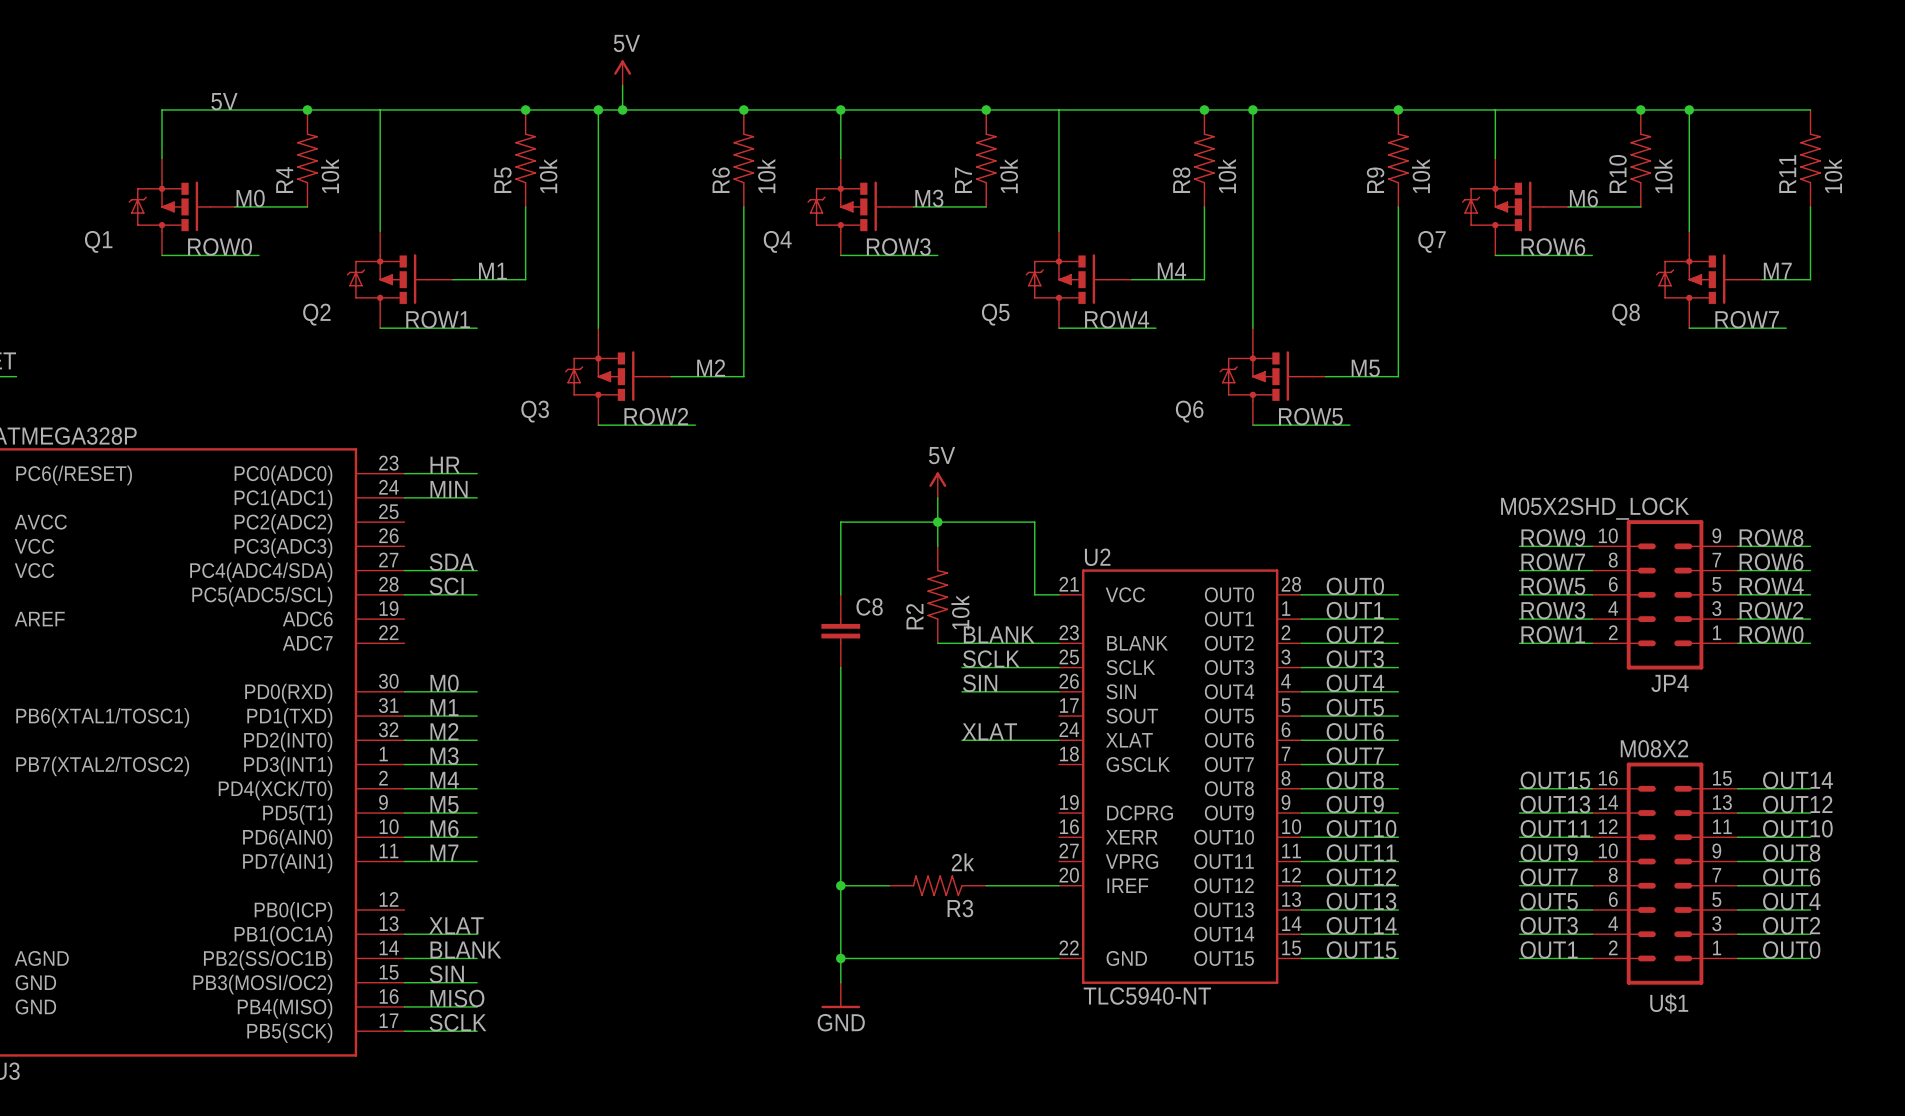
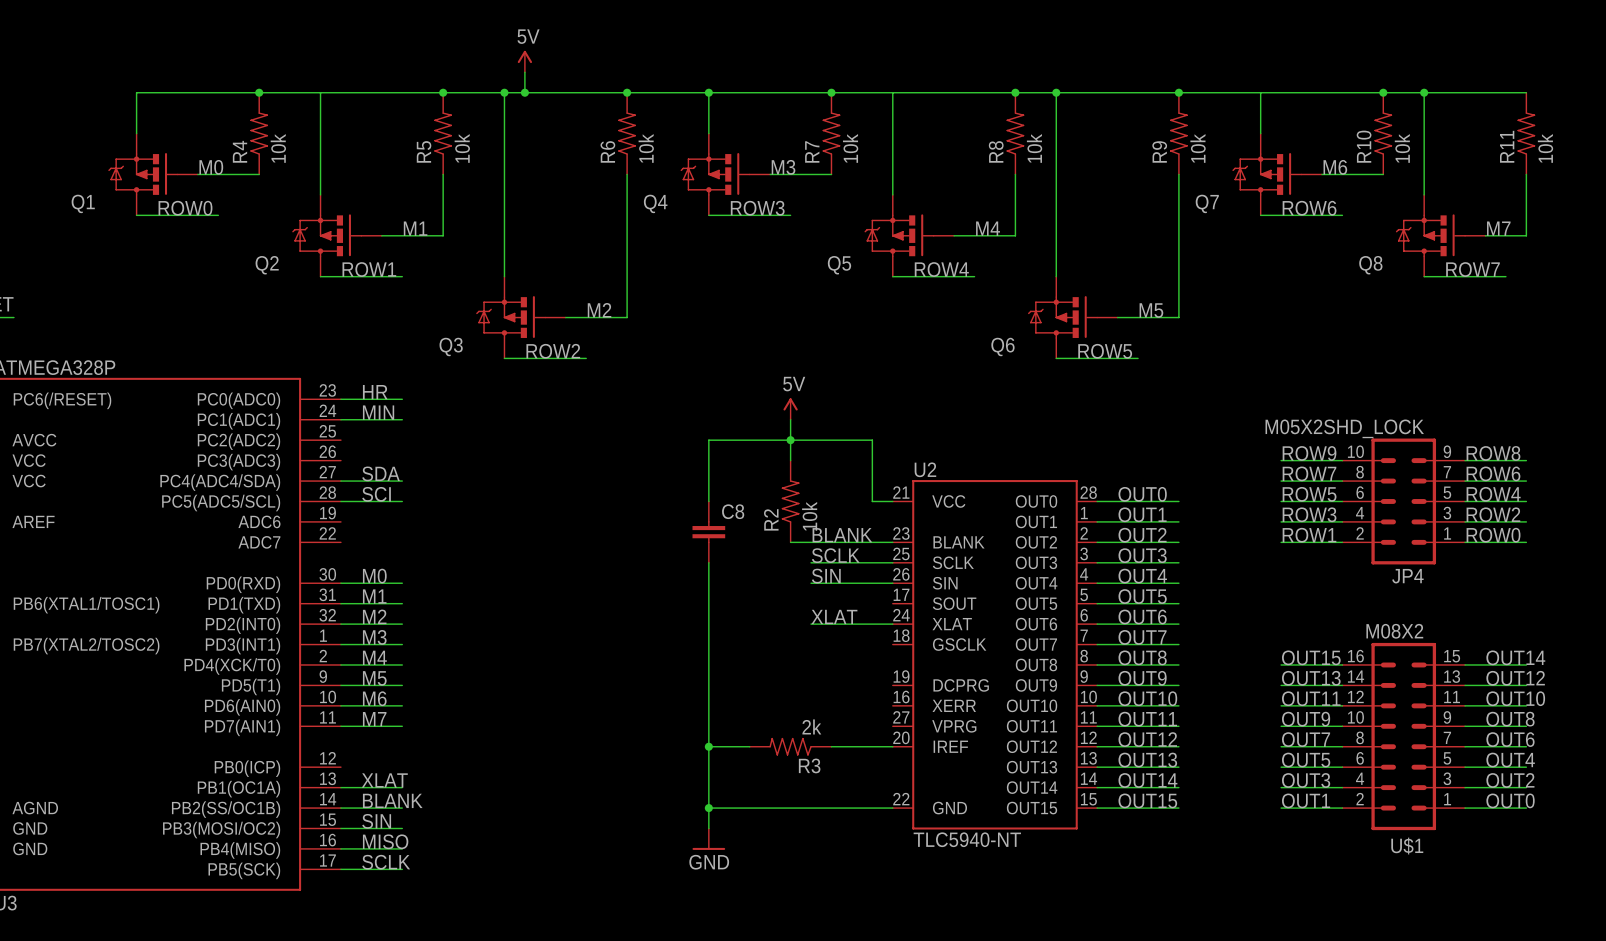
label: 5V (224, 101) -> none

